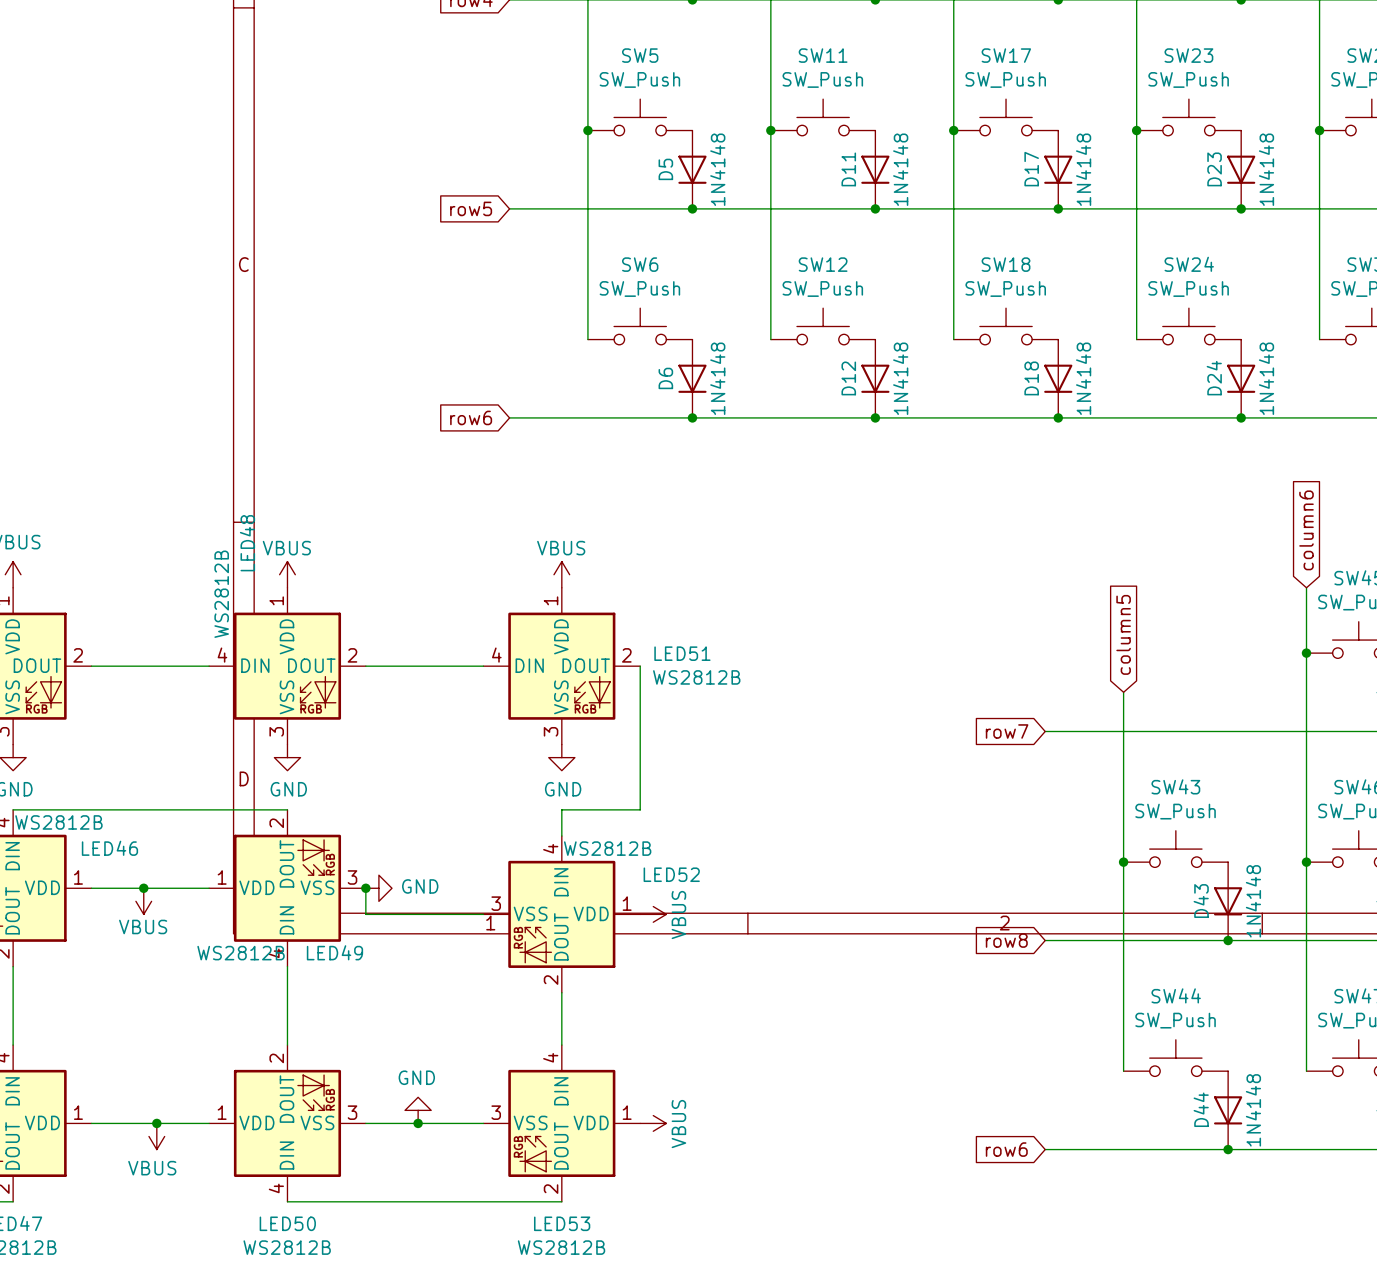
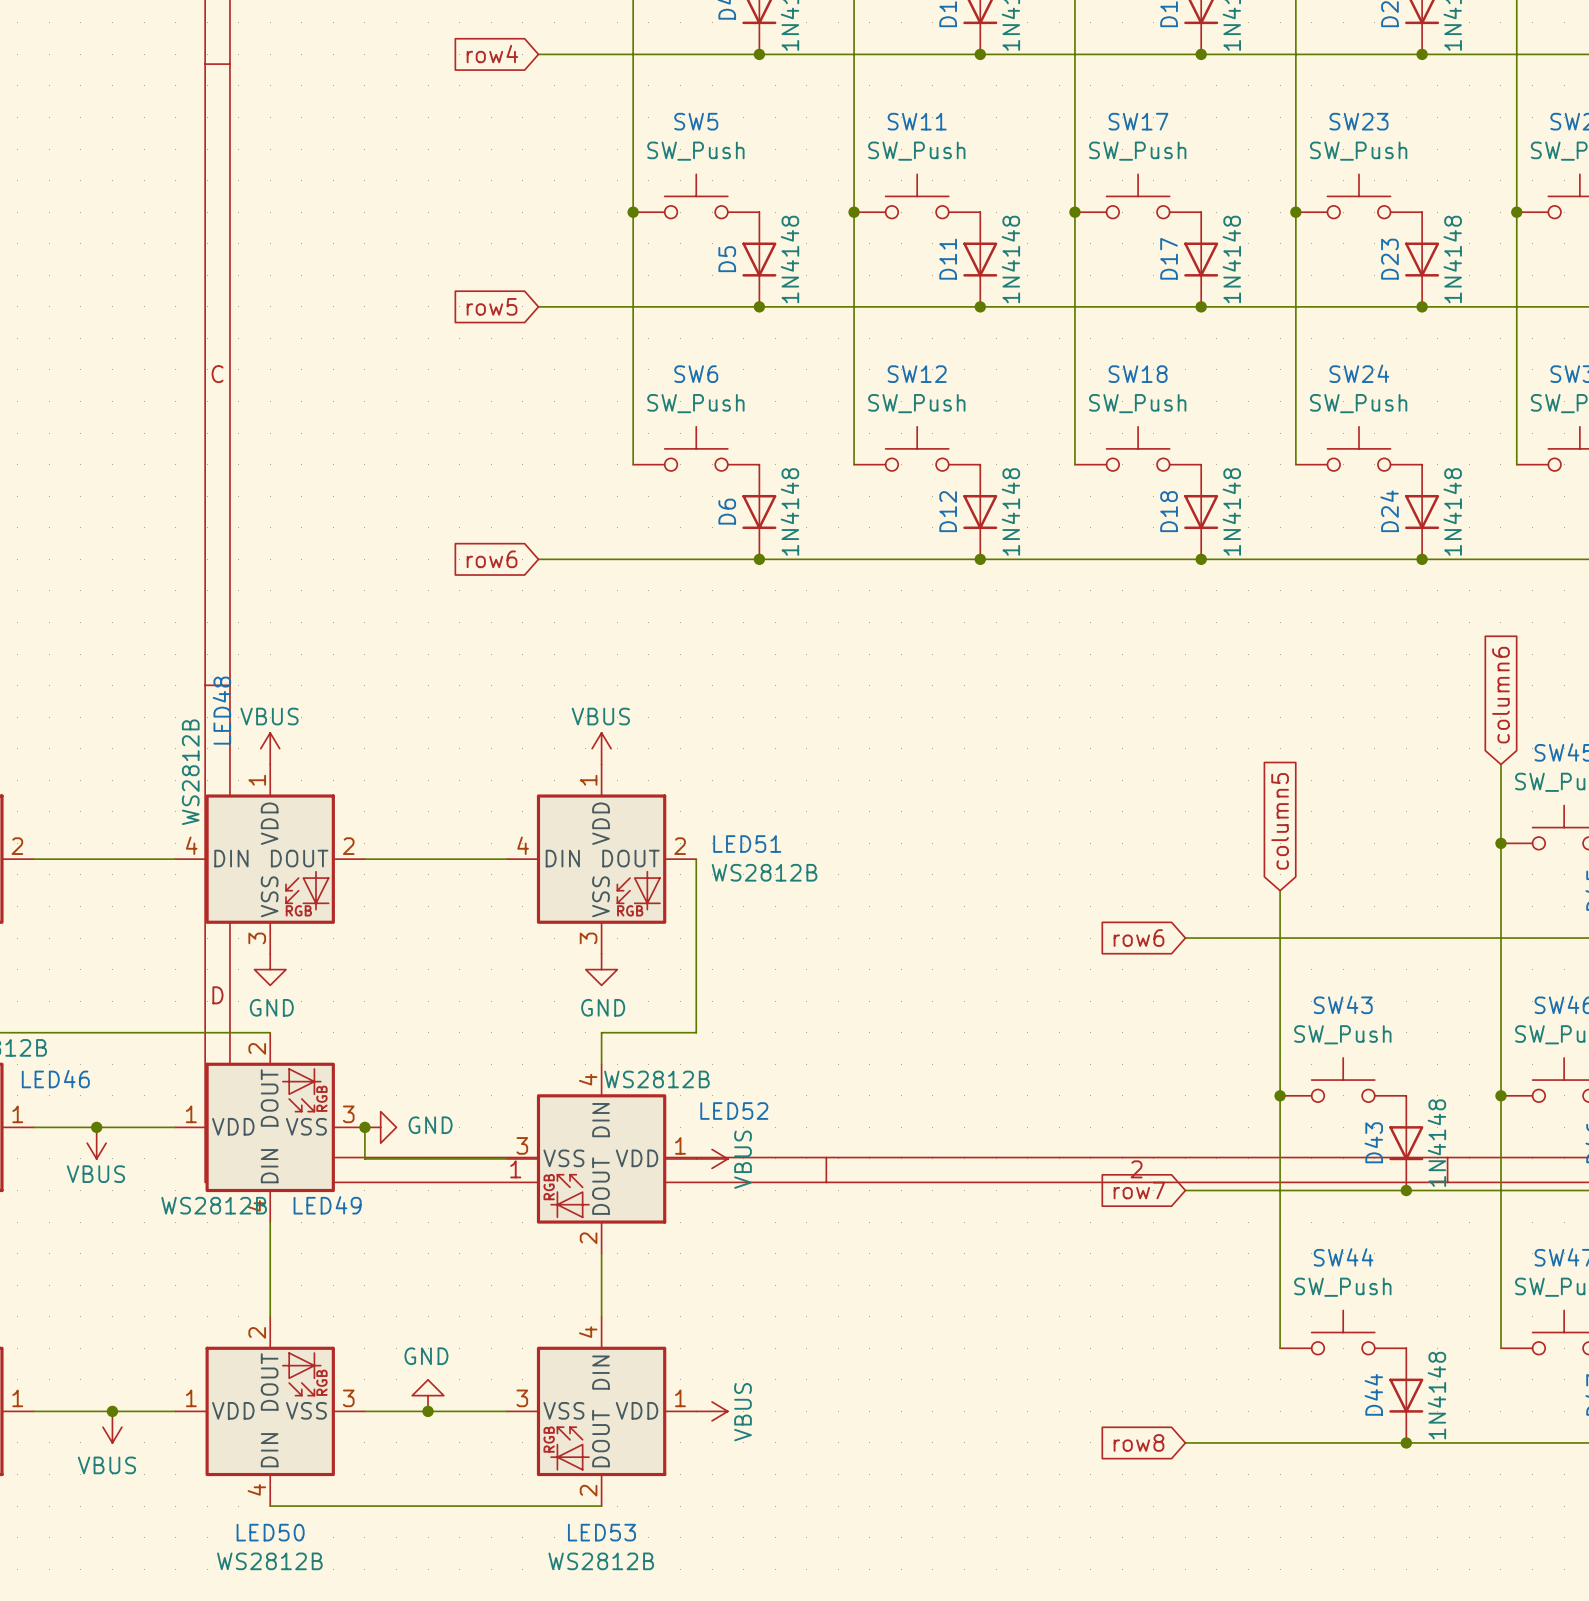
global label: row7 (1007, 731) -> row6 (1138, 938)
global label: row8 (1006, 940) -> row7 (1139, 1190)
global label: row6 (1006, 1149) -> row8 (1138, 1442)

